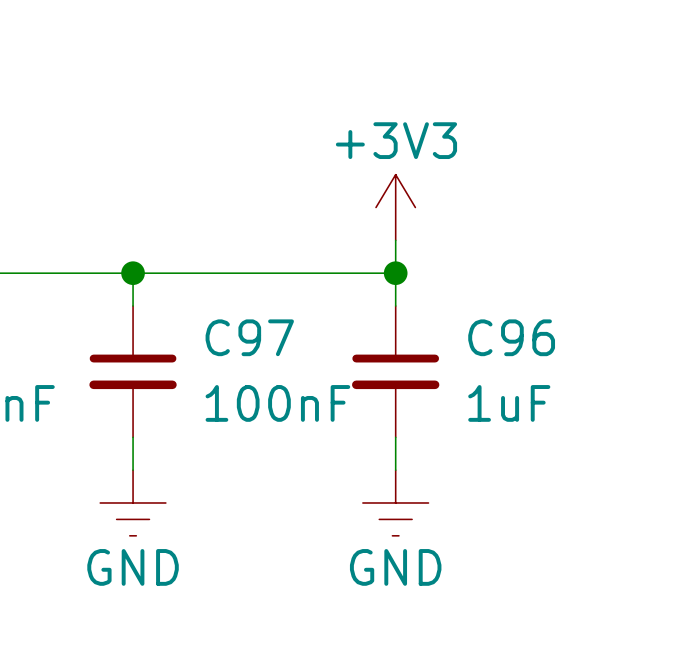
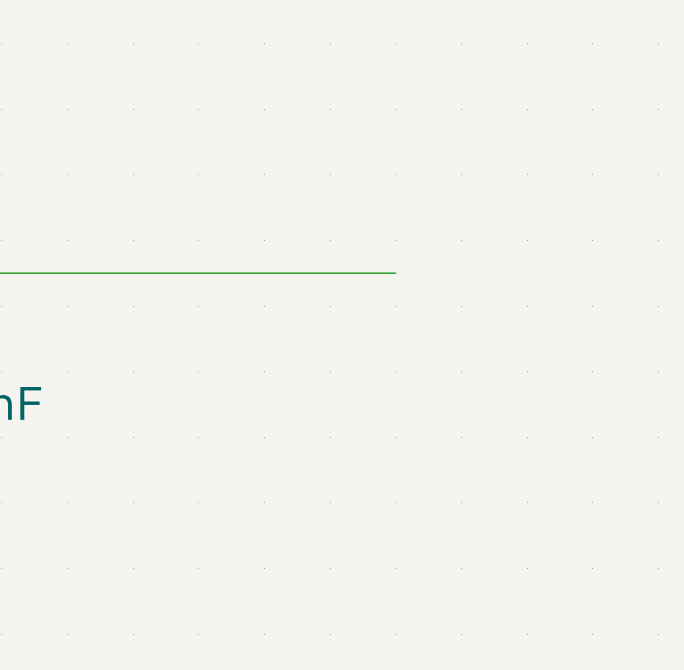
power symbol: +3V3 (395, 207) -> none
wire: (395, 240) (395, 306) -> none
wire: (133, 273) (133, 306) -> none
junction: (133, 273) -> none
junction: (395, 273) -> none
C97: 100nF (133, 371) -> none
C96: 1uF (395, 371) -> none
wire: (133, 437) (133, 470) -> none
wire: (395, 437) (395, 470) -> none
power symbol: GND (133, 502) -> none
power symbol: GND (395, 502) -> none

